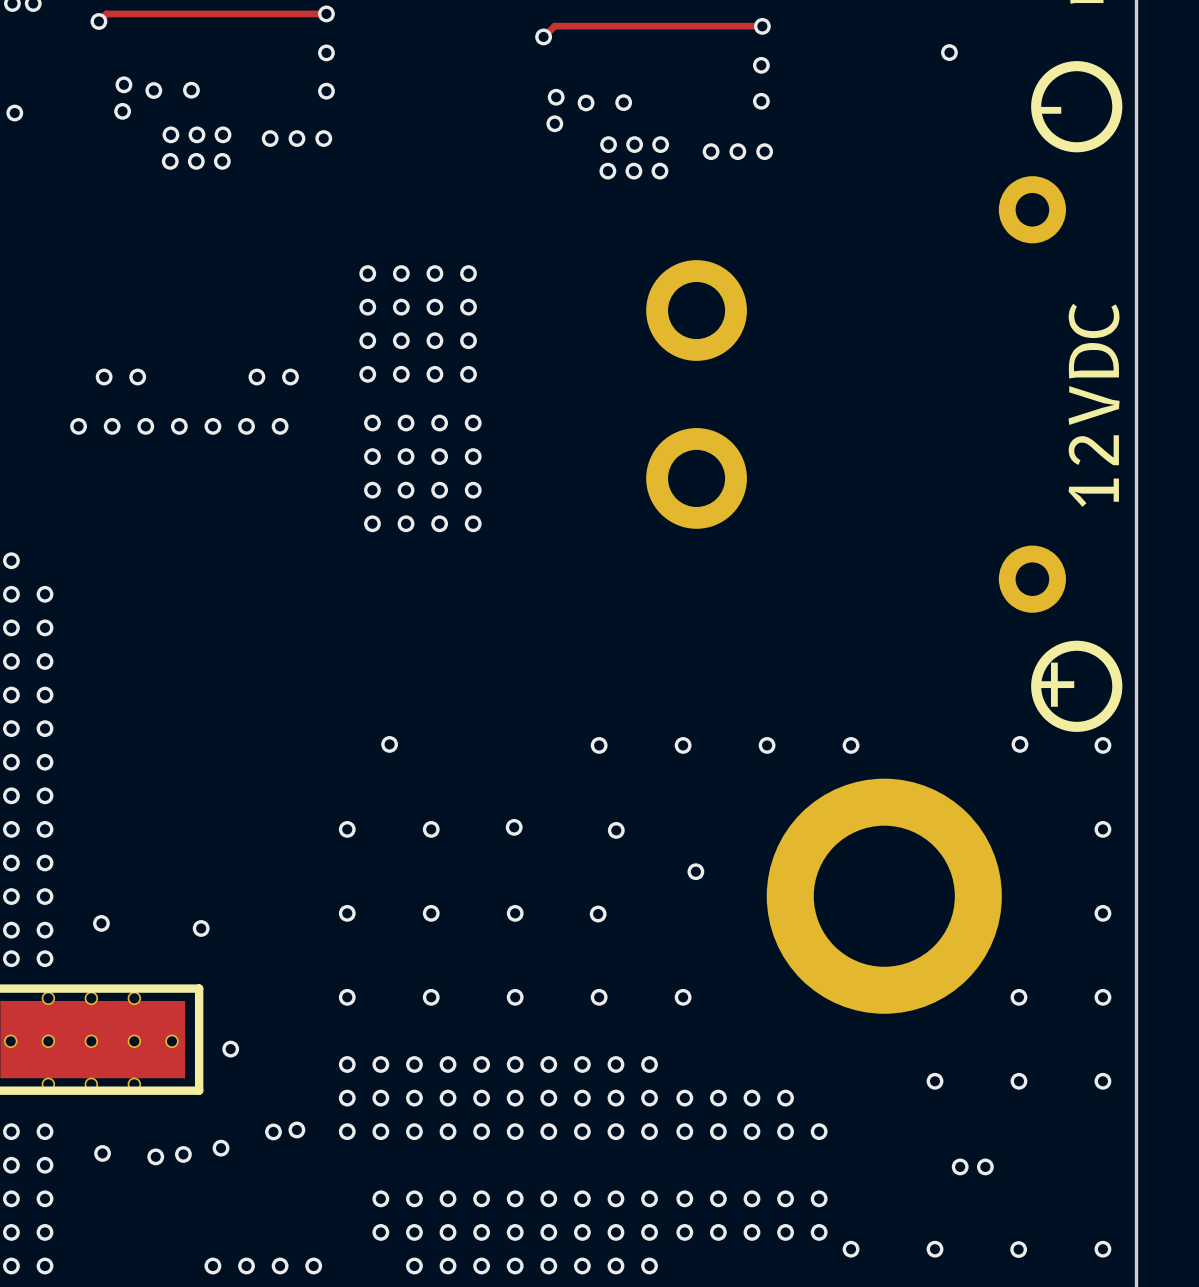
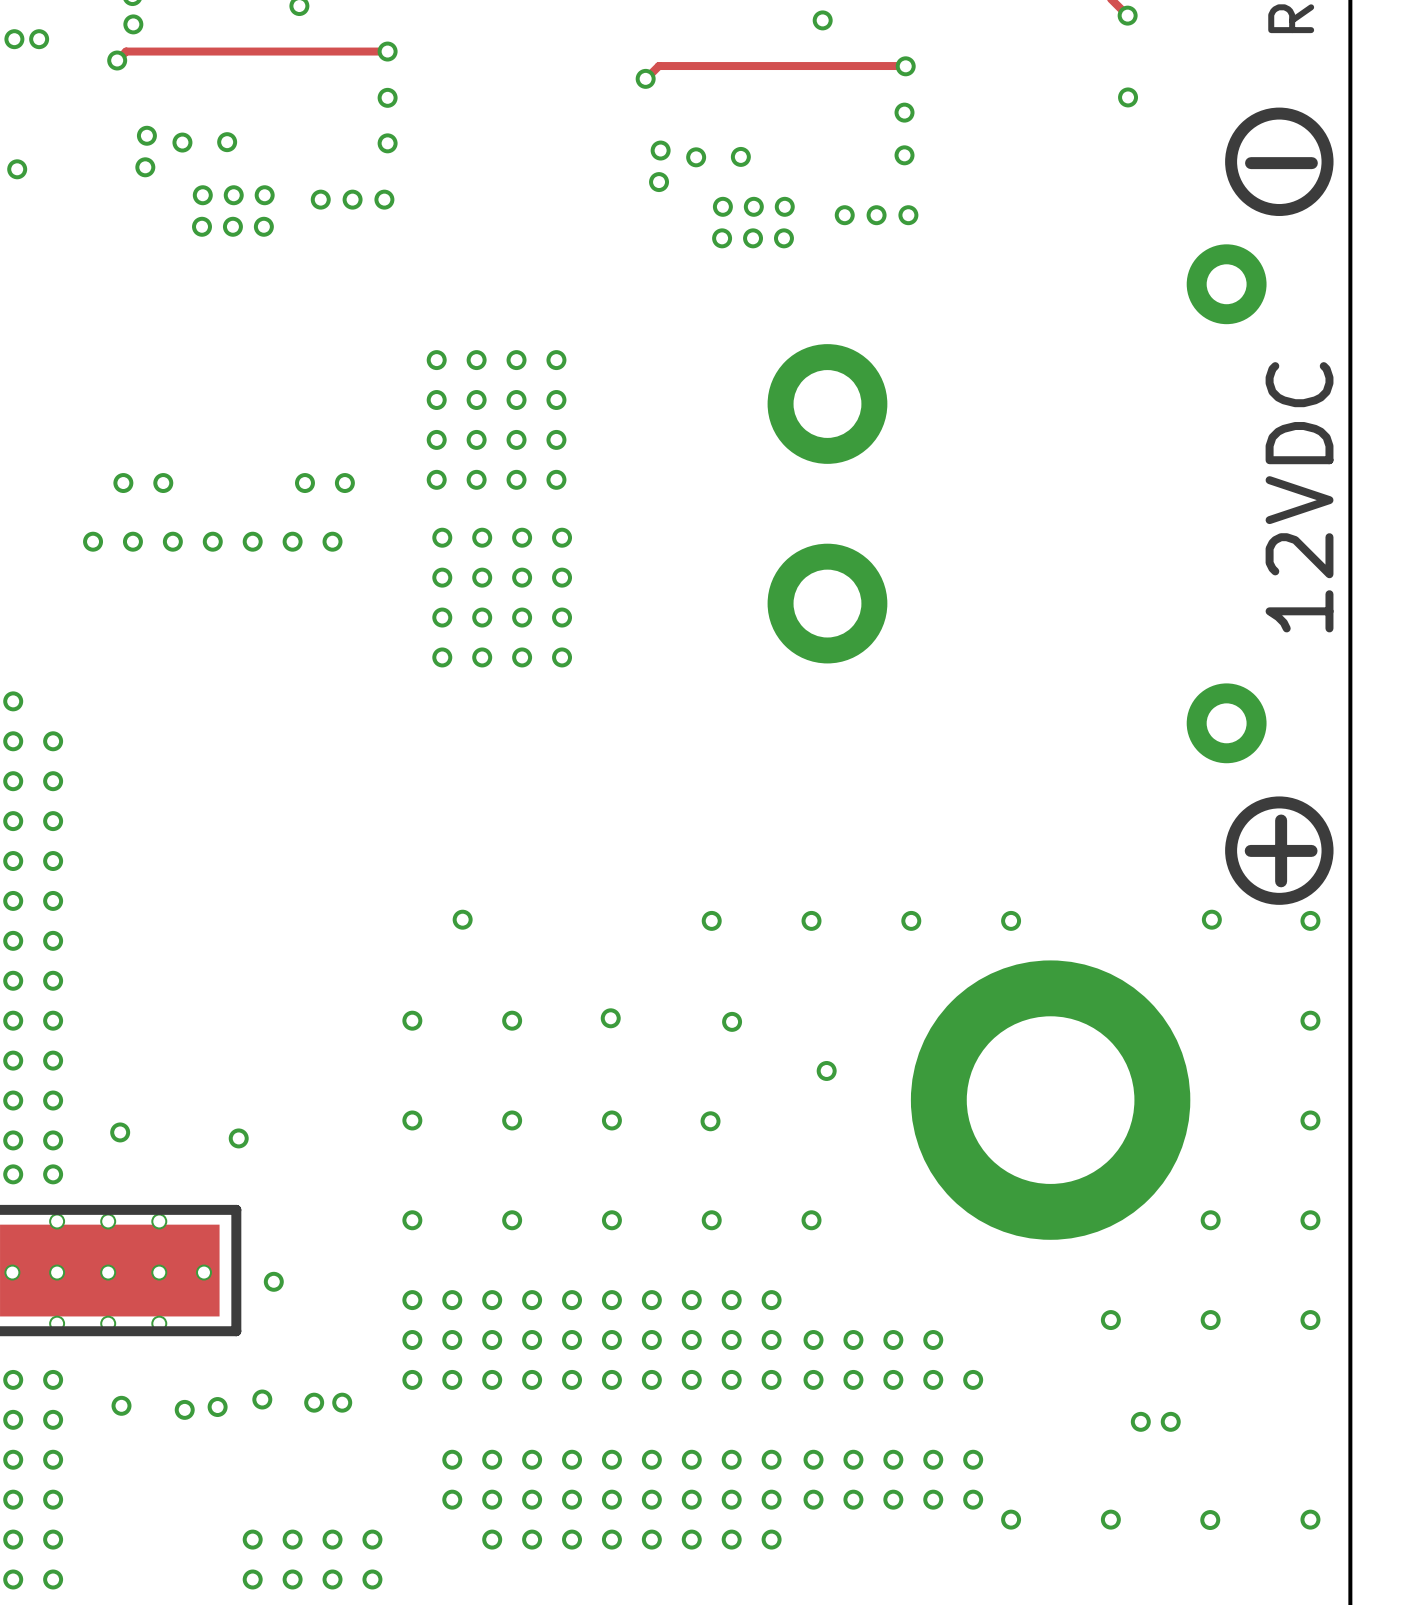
via: (296, 1129) -> none
via: (273, 1131) -> none
via: none -> (314, 1402)
via: none -> (342, 1402)

